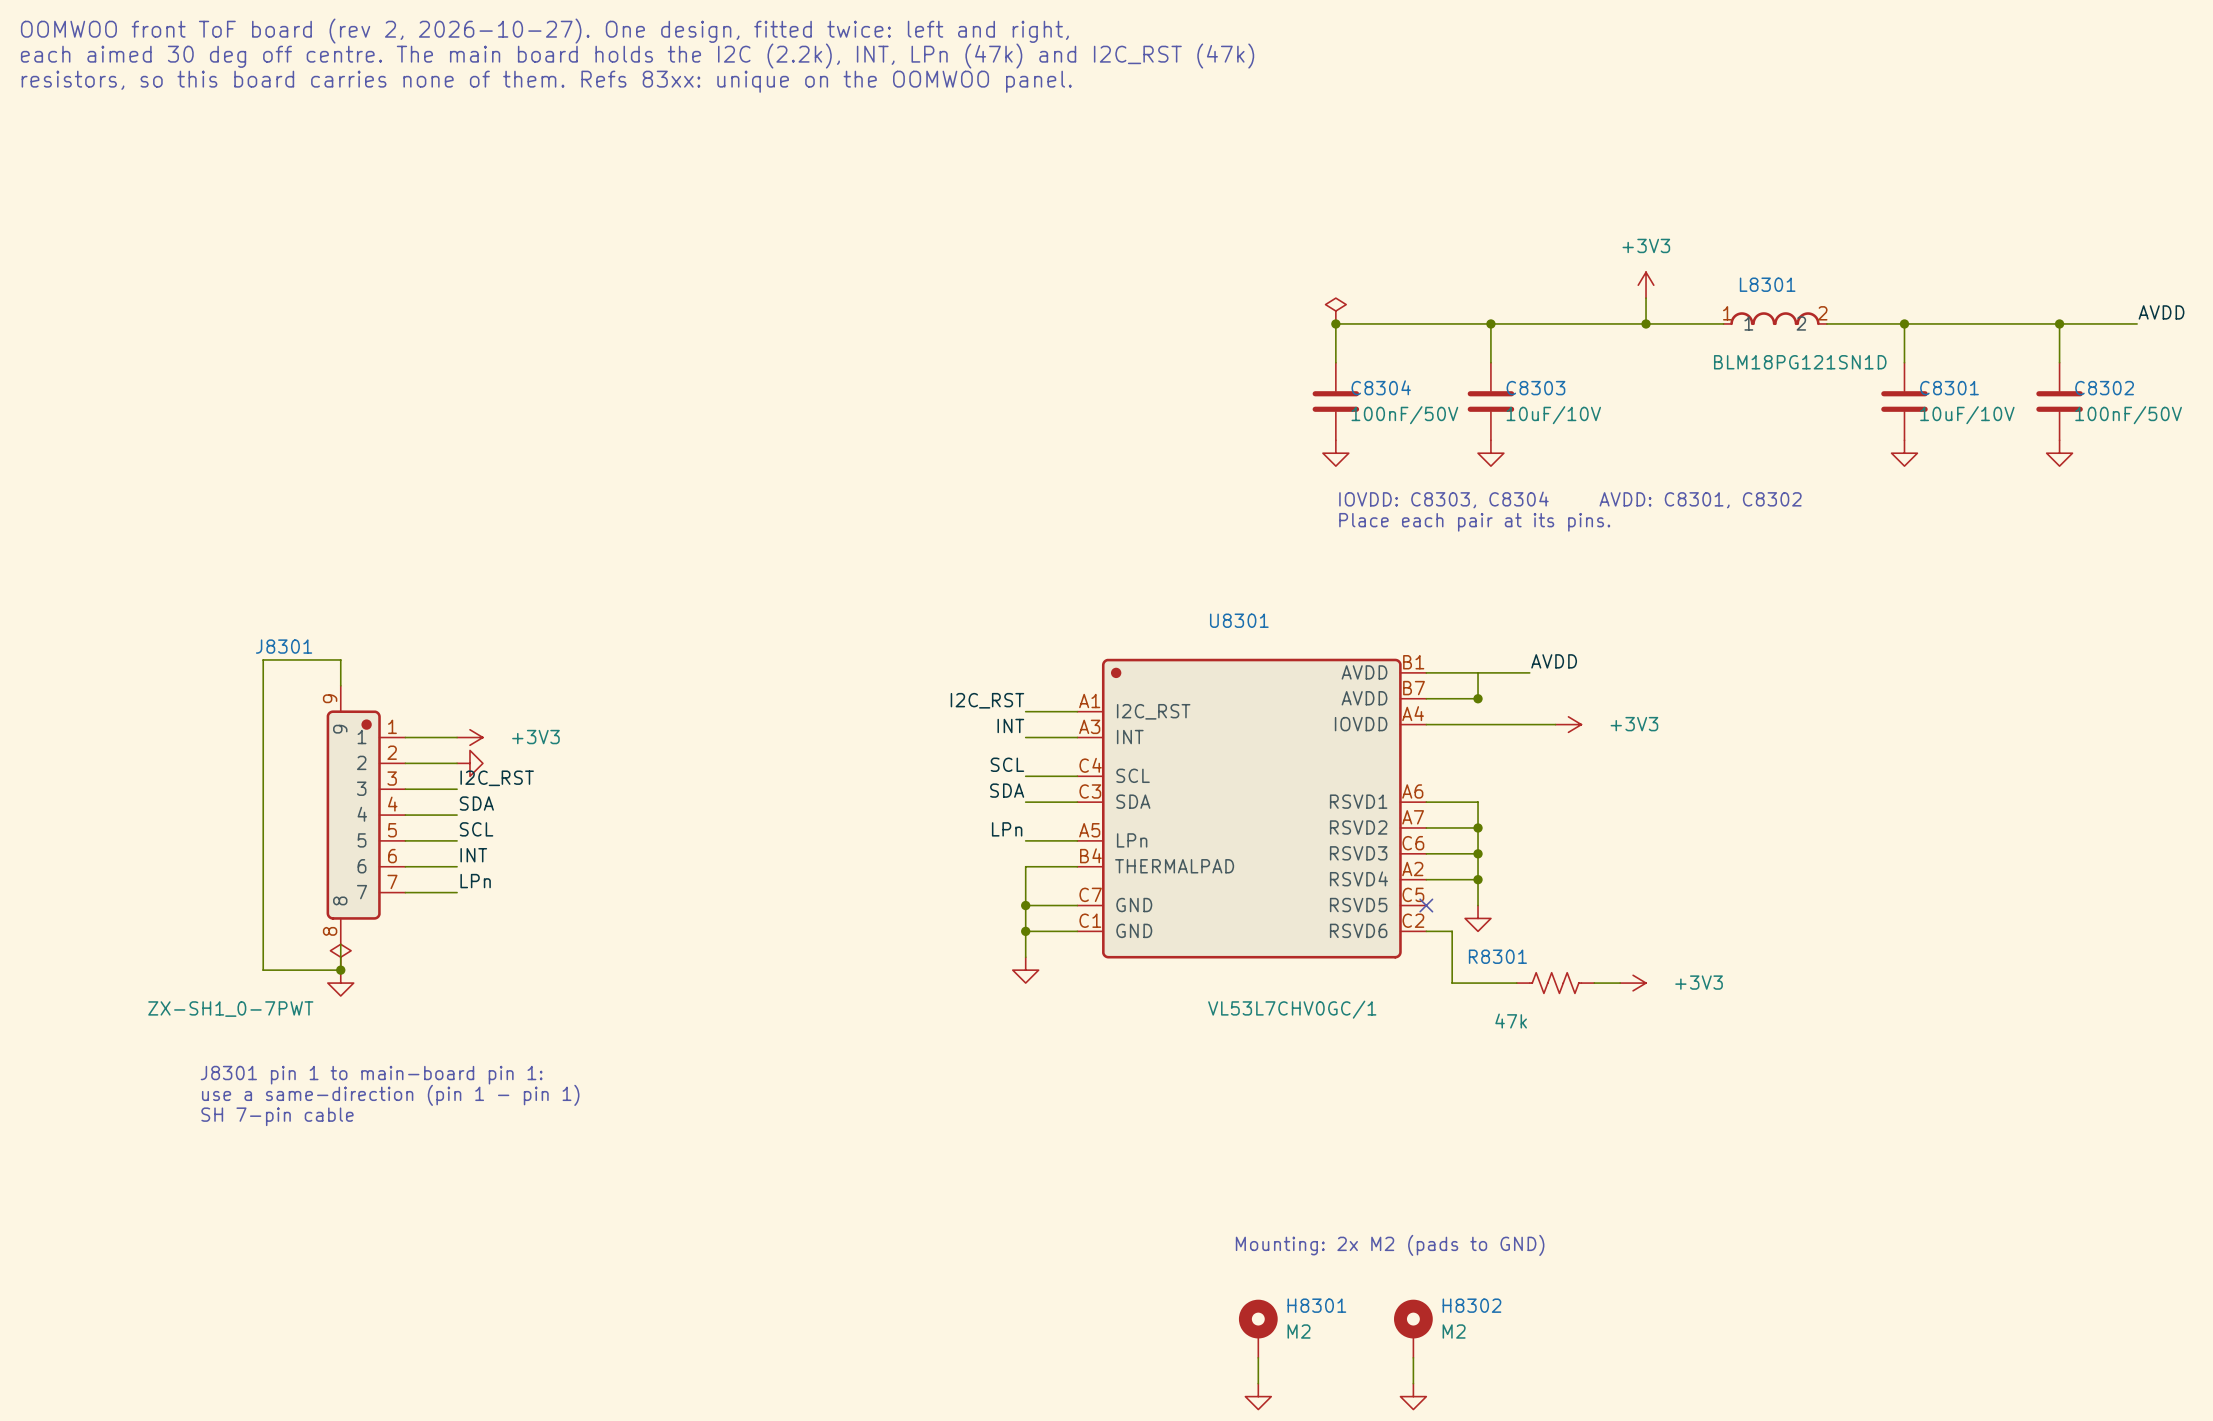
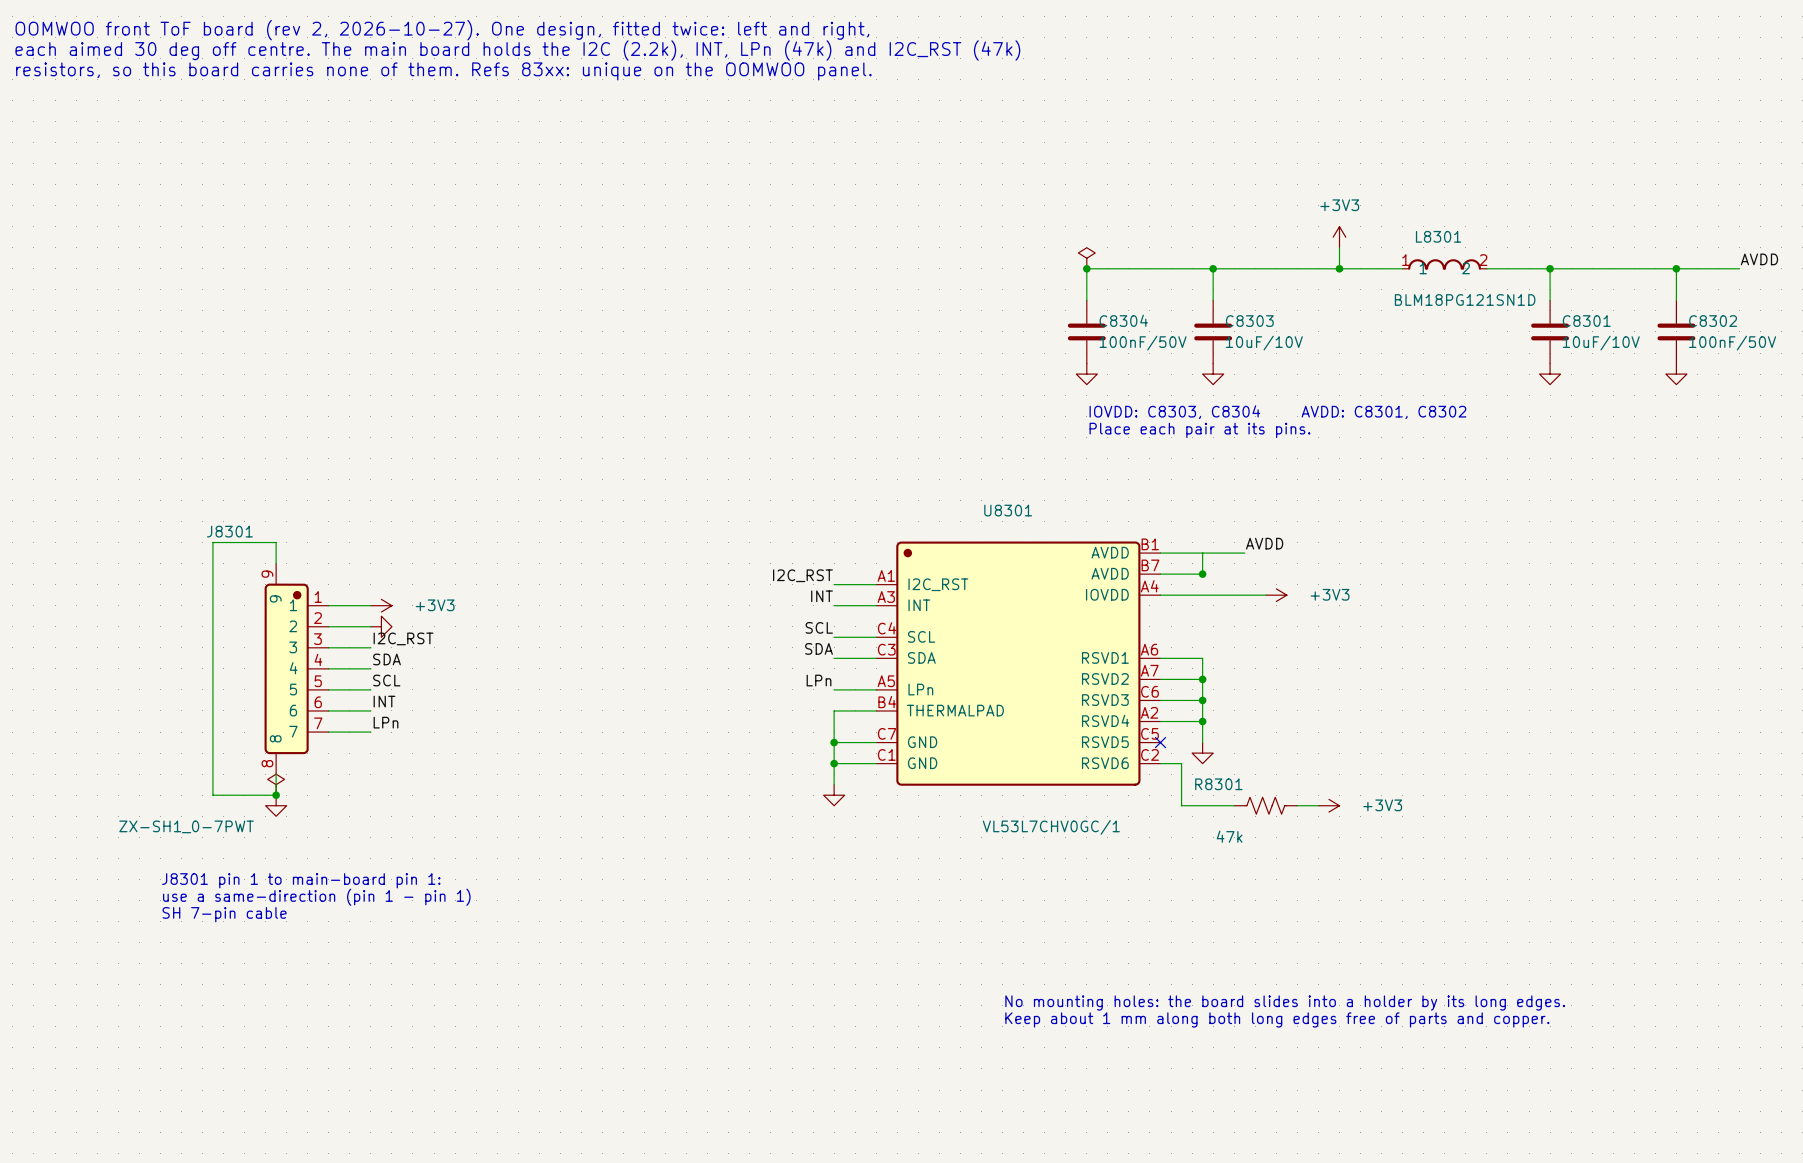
text: none -> No mounting holes: the board slides into a holder by its long edges. (1285, 1003)
text: Mounting: 2x M2 (pads to GND) (1390, 1245) -> Keep about 1 mm along both long edges free of parts and copper. (1277, 1019)
H8301: M2 (1258, 1328) -> none
H8302: M2 (1413, 1328) -> none
wire: (1258, 1357) (1258, 1383) -> none
wire: (1413, 1357) (1413, 1383) -> none
power symbol: (1258, 1396) -> none
power symbol: (1413, 1396) -> none

